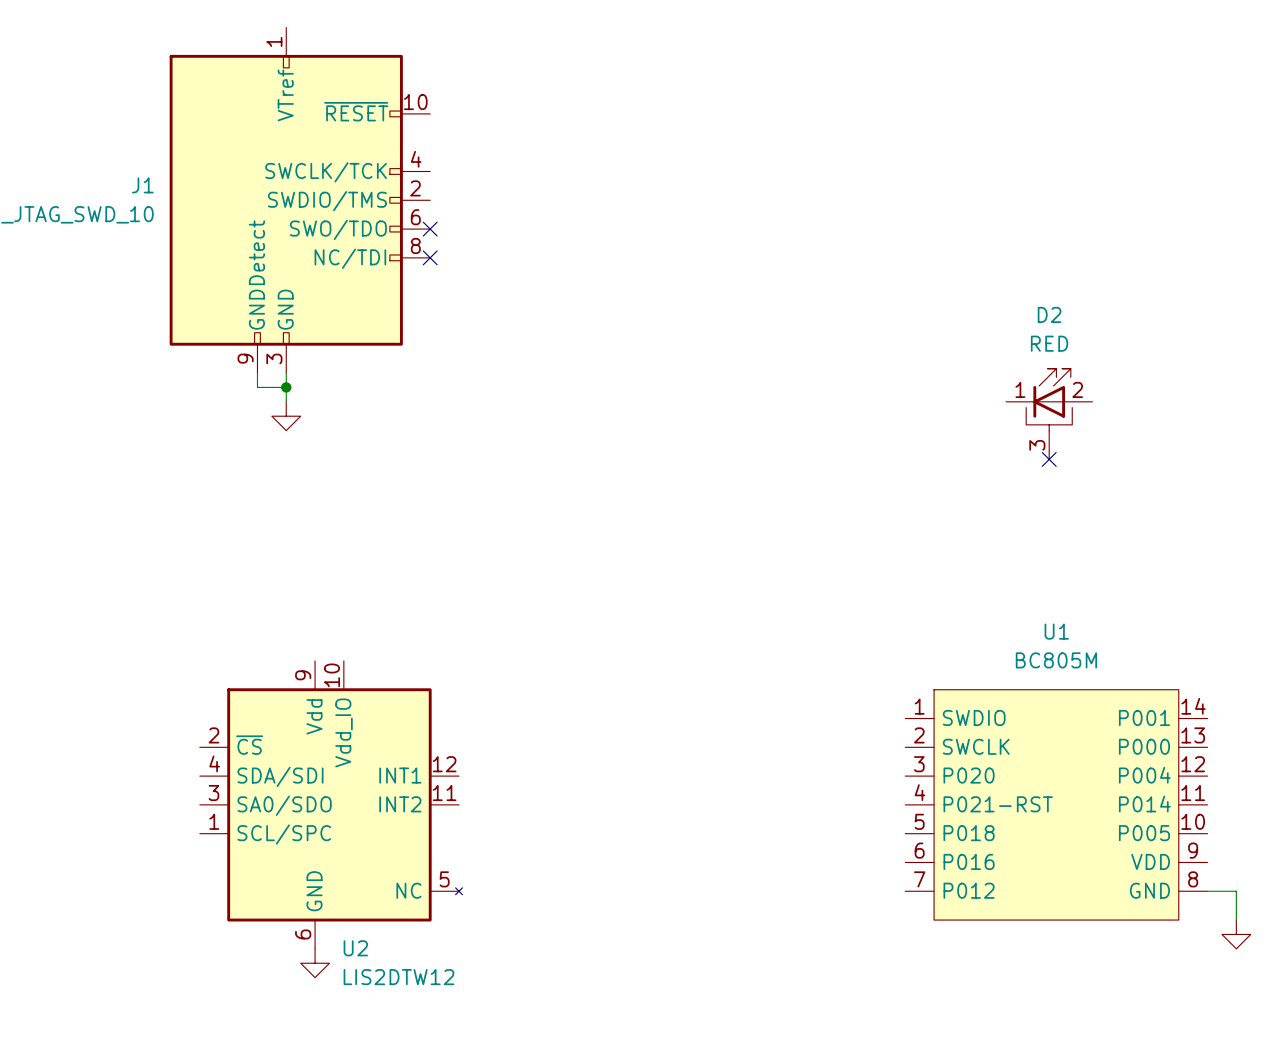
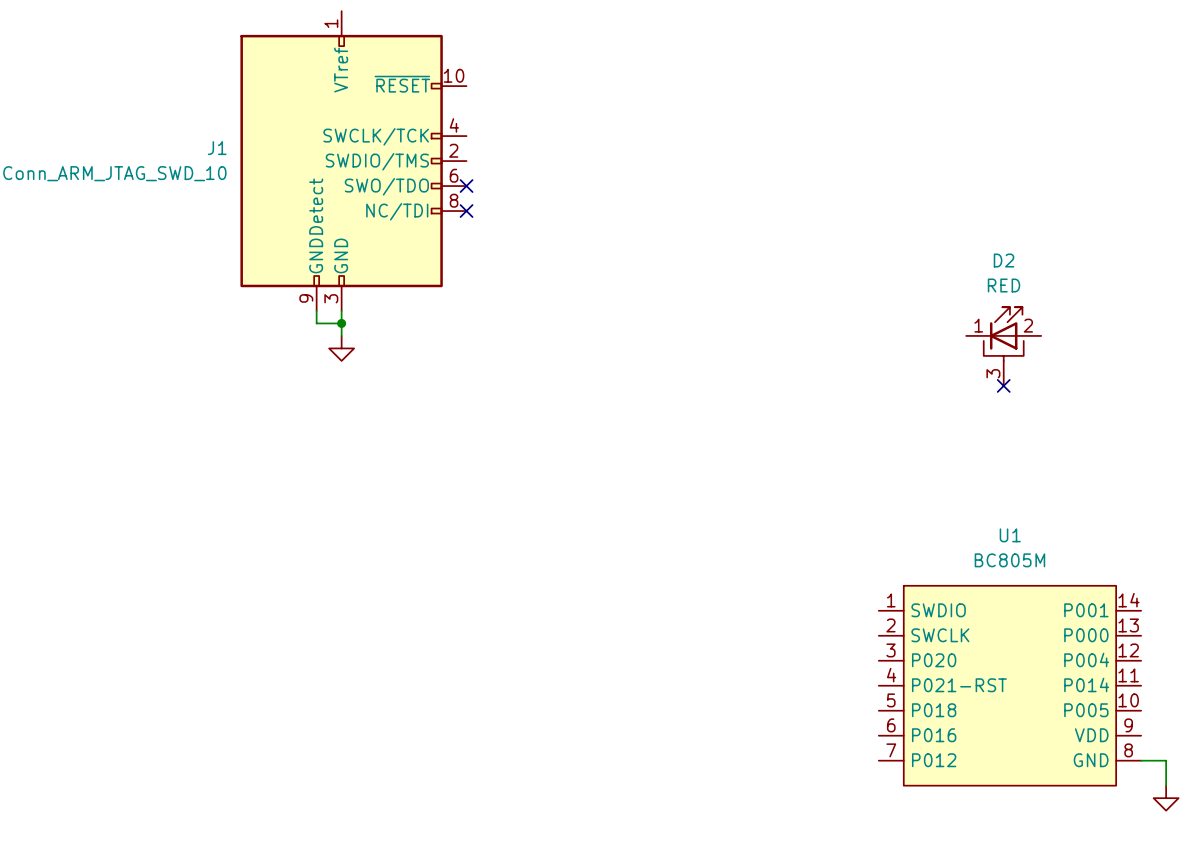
U2: LIS2DTW12 (331, 804) -> none
power symbol: (315, 963) -> none

